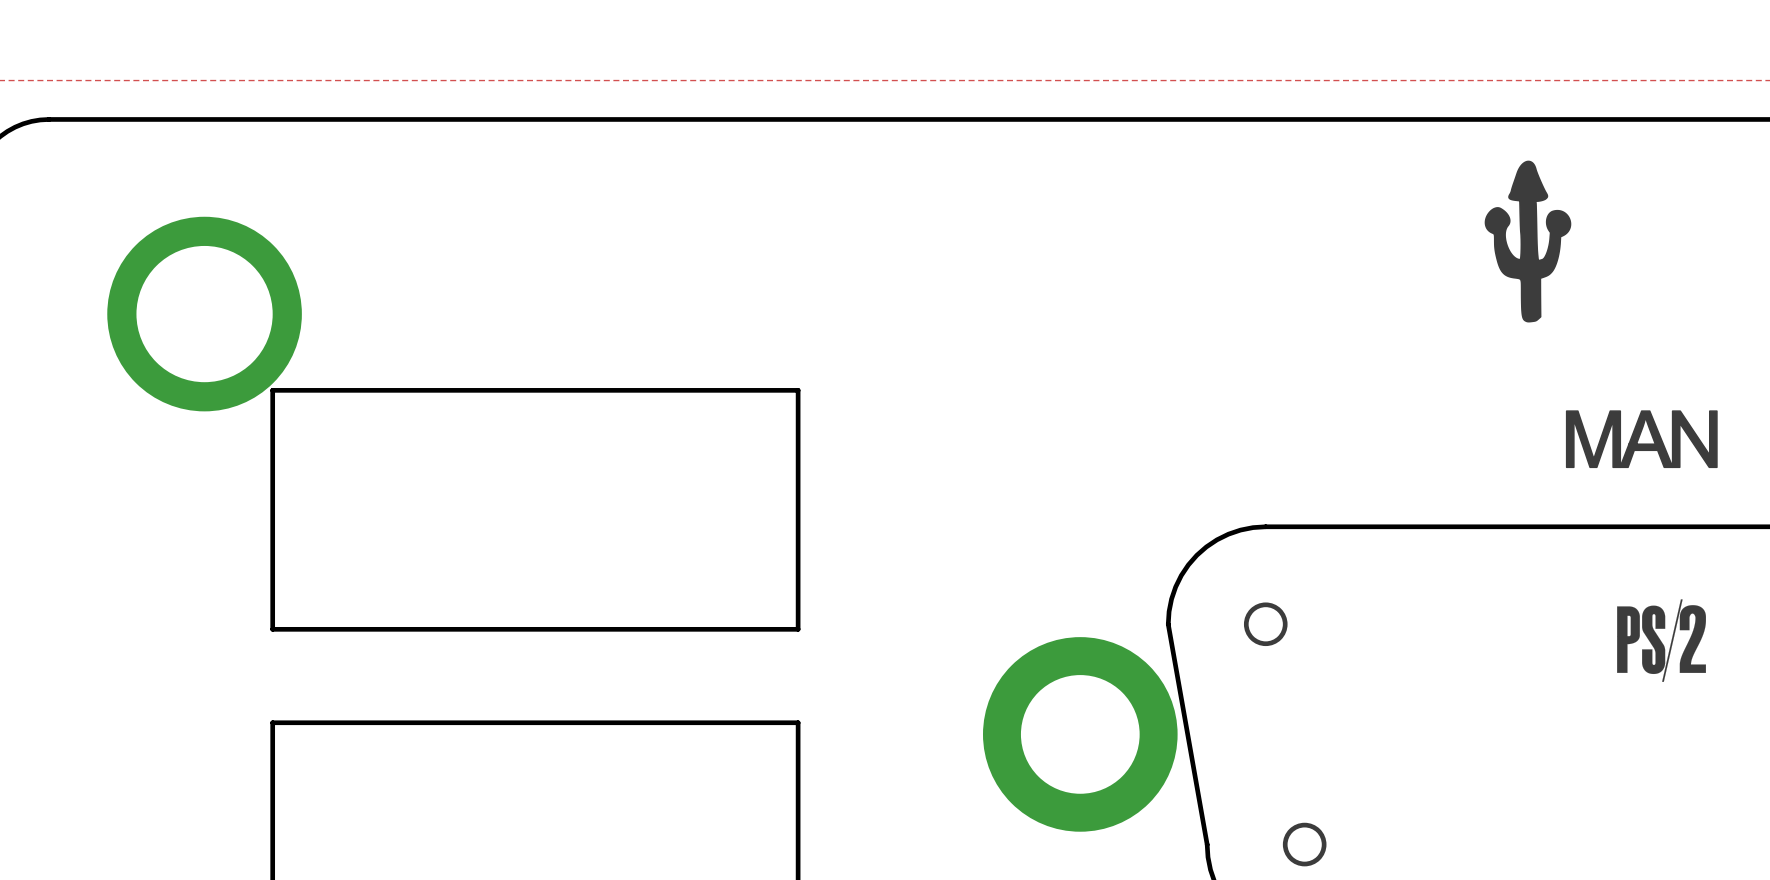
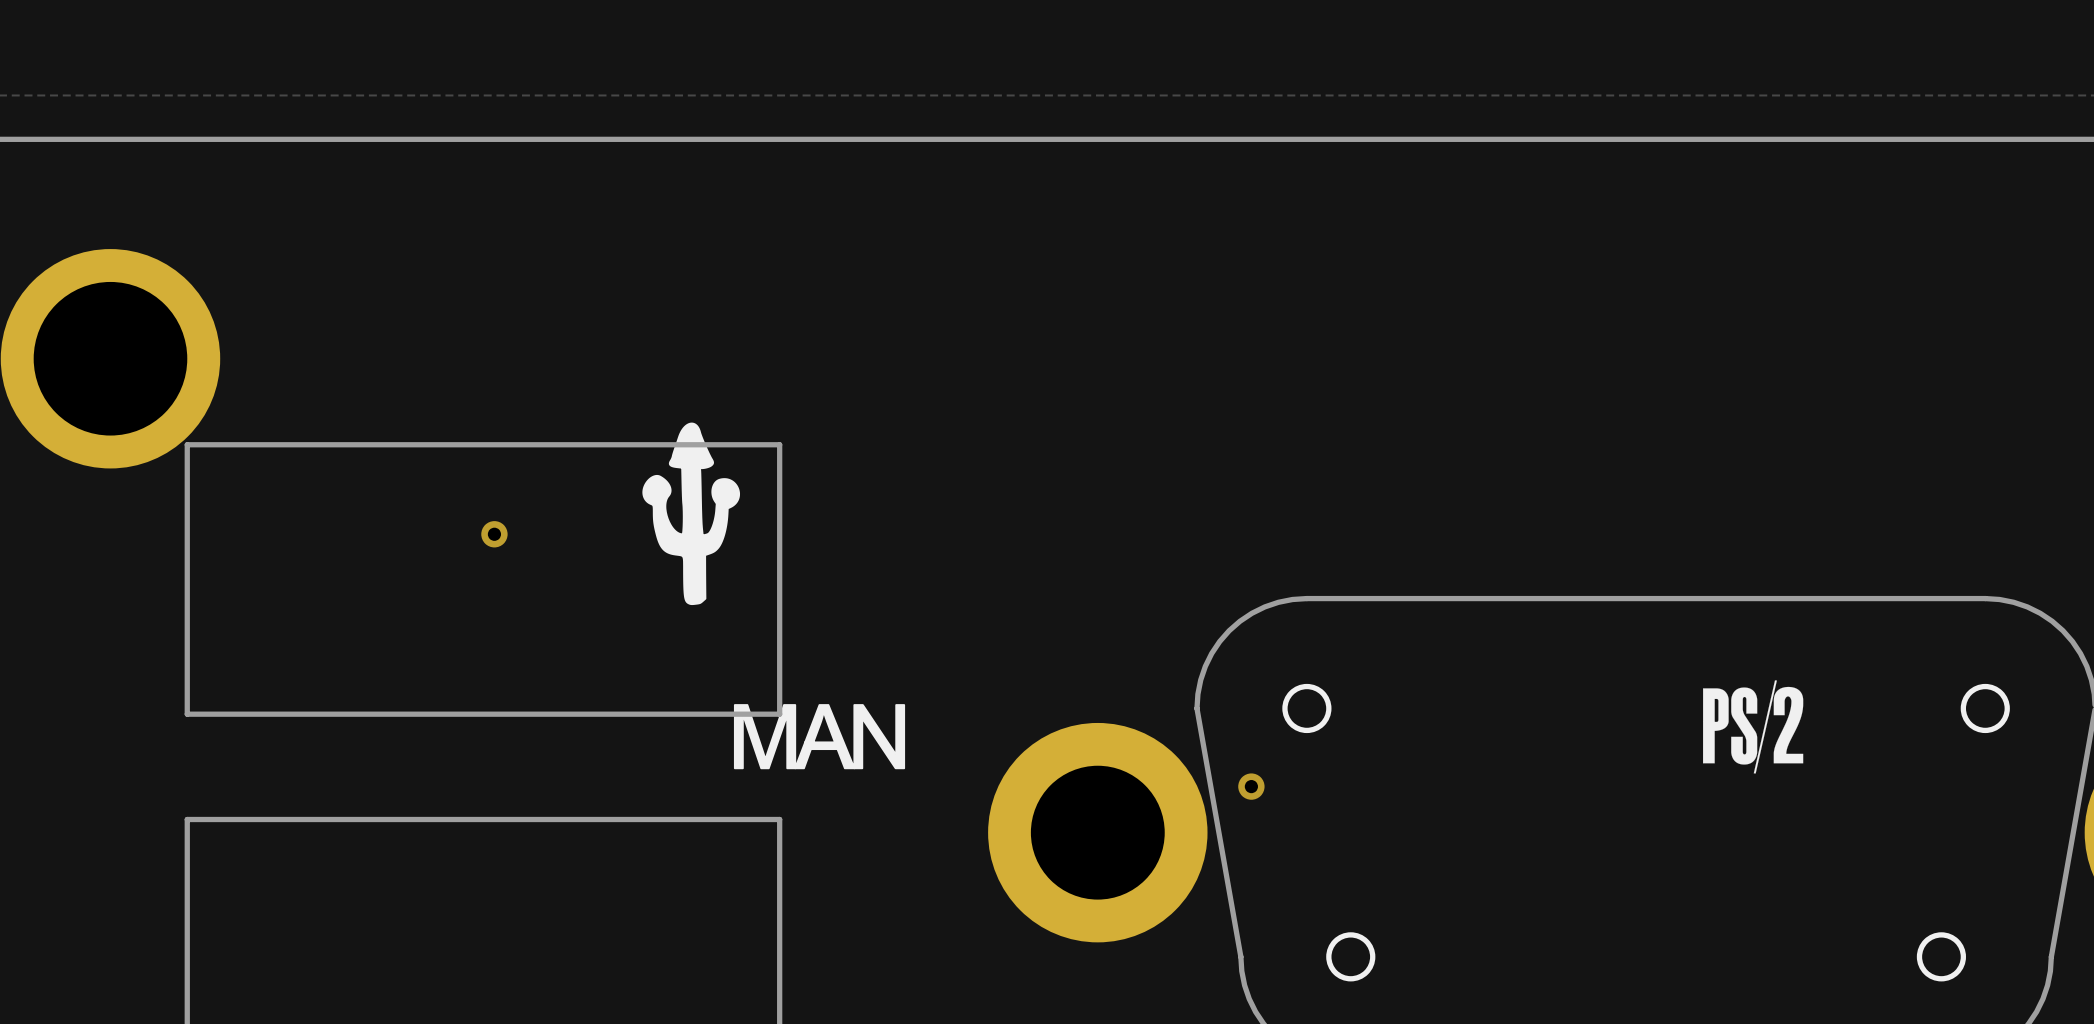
drawing position: (1527, 241) -> (691, 513)
drawing position: (1593, 439) -> (765, 736)
drawing position: (1646, 439) -> (824, 736)
drawing position: (1694, 439) -> (879, 736)
via: none -> (494, 534)
via: none -> (1251, 786)

